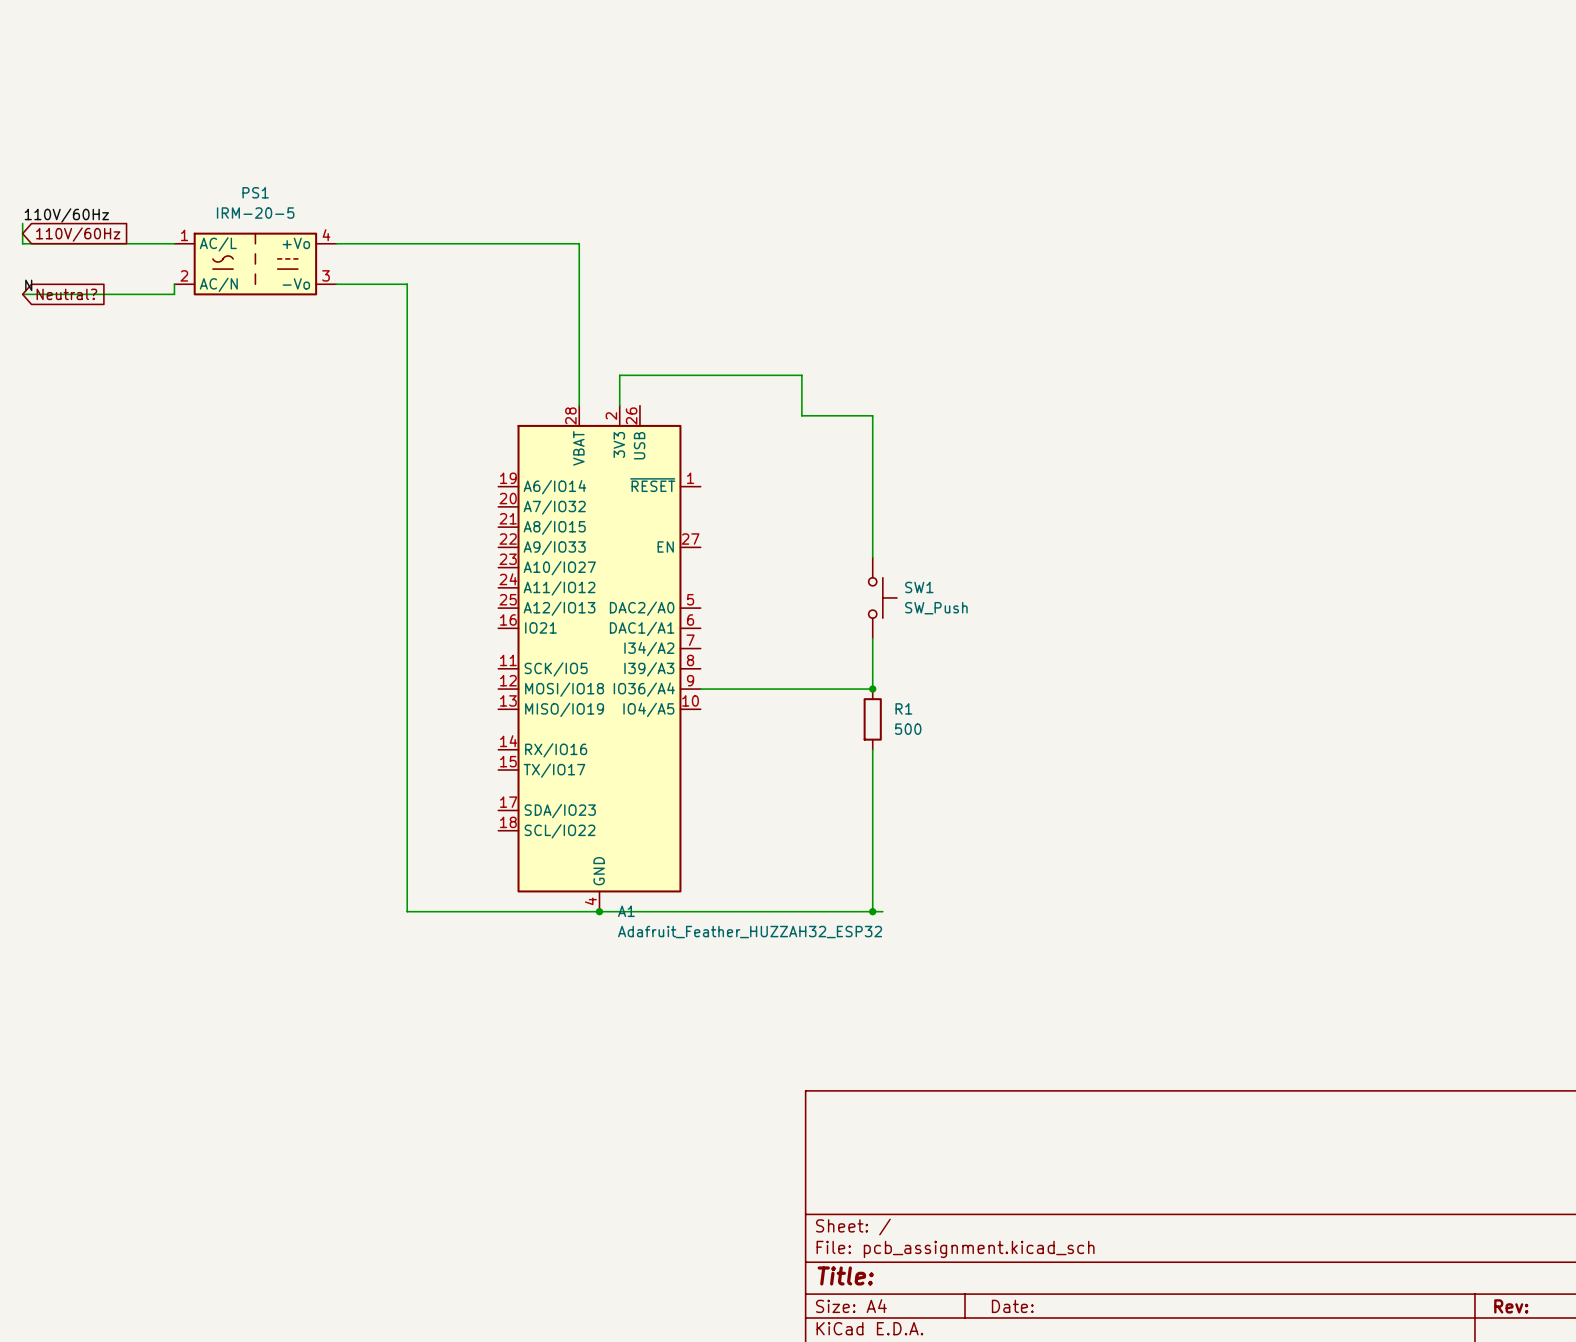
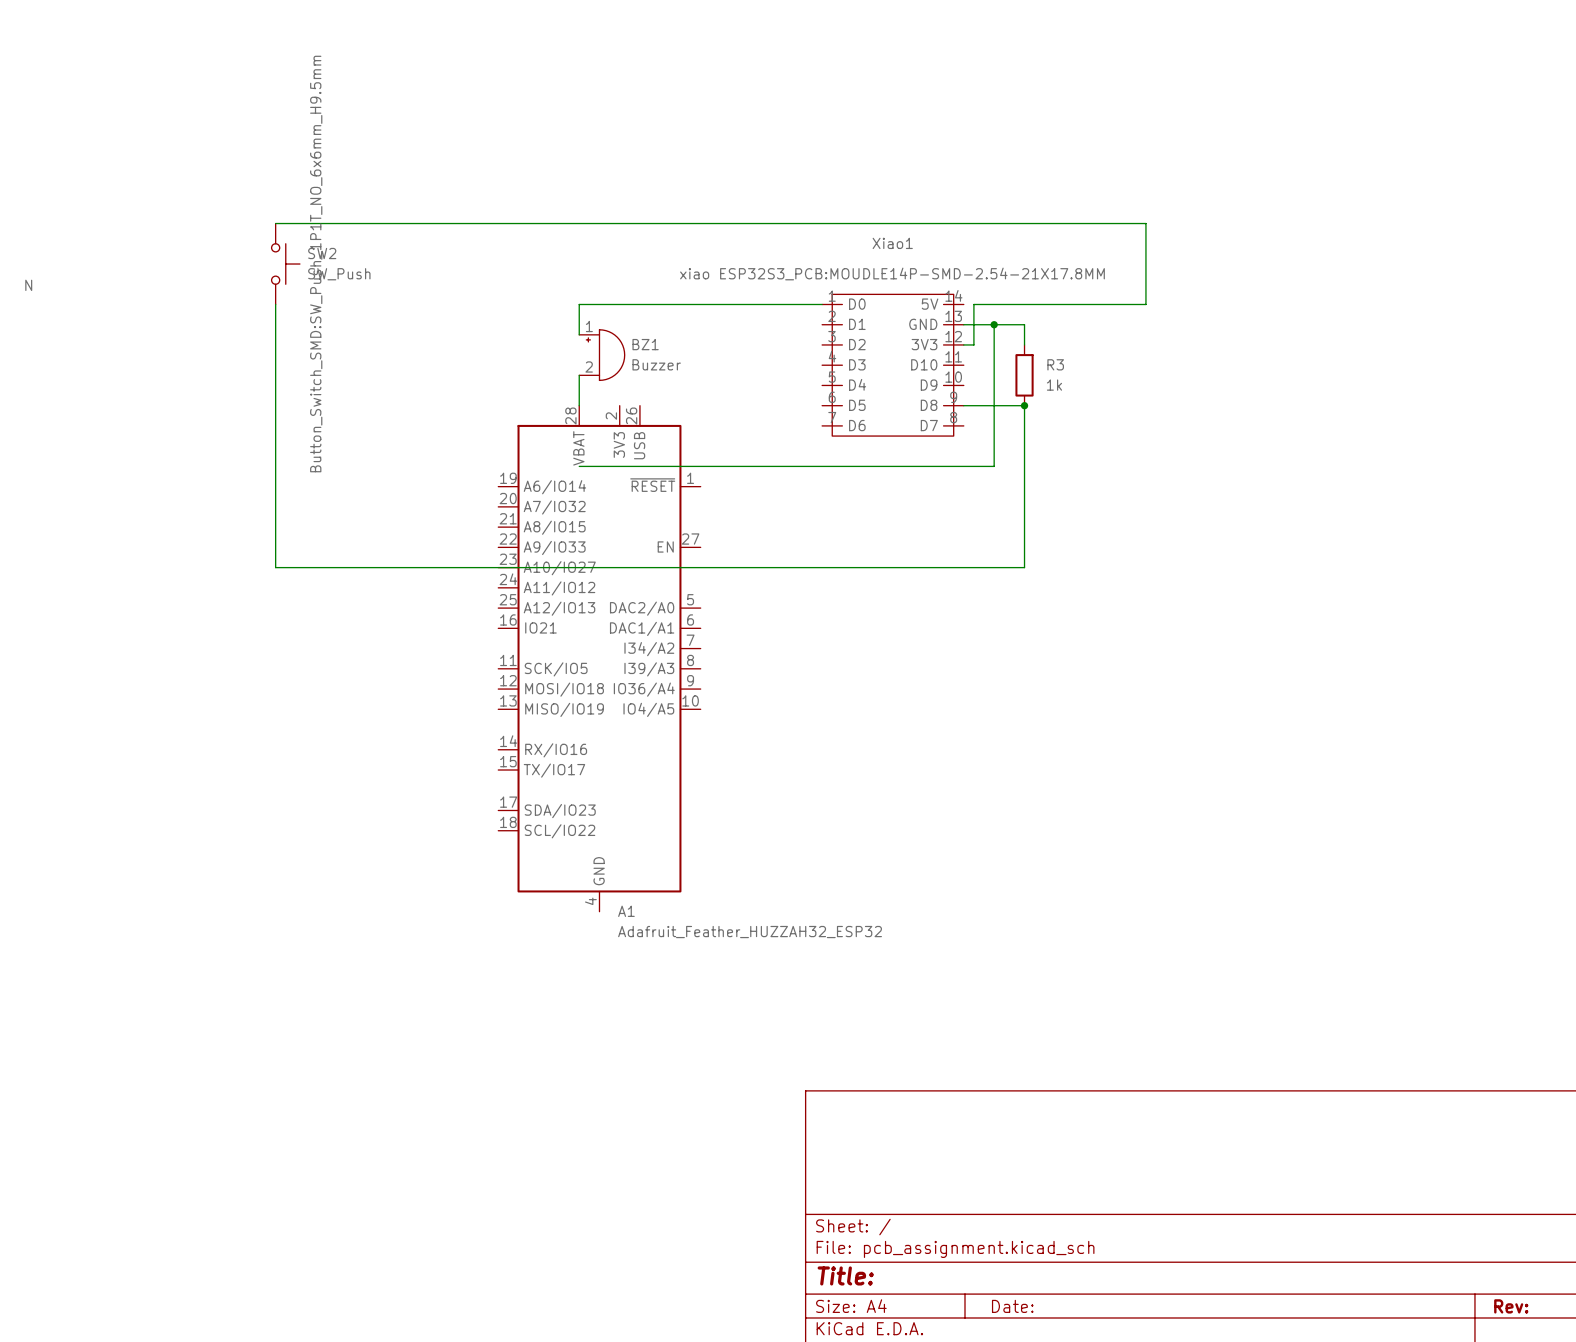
label: 110V/60Hz (66, 215) -> none
wire: (22, 223) (22, 243) (174, 243) -> none
wire: none -> (275, 223) (1145, 223) (1145, 304) (973, 304) (973, 344) (963, 344)
global label: 110V/60Hz (78, 234) -> none
wire: (336, 243) (579, 243) (579, 304) -> (822, 304) (579, 304)
PS1: IRM-20-5 (255, 264) -> none
SW2: none -> SW_Push (285, 264)
wire: (174, 284) (174, 294) (22, 294) -> none
wire: (336, 284) (407, 284) (407, 911) (882, 911) -> none
global label: Neutral? (66, 294) -> none
wire: none -> (275, 304) (275, 567) (1024, 567) (1024, 405) (963, 405)
wire: none -> (963, 324) (1024, 324) (1024, 344)
wire: none -> (994, 324) (994, 466) (579, 466)
junction: none -> (994, 324)
wire: (579, 334) (579, 375) -> none
BZ1: none -> Buzzer (601, 355)
Xiao1: none -> (892, 365)
R3: none -> 1k (1024, 375)
wire: (619, 405) (619, 375) (801, 375) (801, 415) (872, 415) (872, 557) -> none
junction: none -> (1024, 405)
SW1: SW_Push (882, 597) -> none
wire: (872, 638) (872, 689) (700, 689) -> none
junction: (872, 689) -> none
R1: 500 (872, 719) -> none
wire: (872, 749) (872, 911) -> none
junction: (599, 911) -> none
junction: (872, 911) -> none

